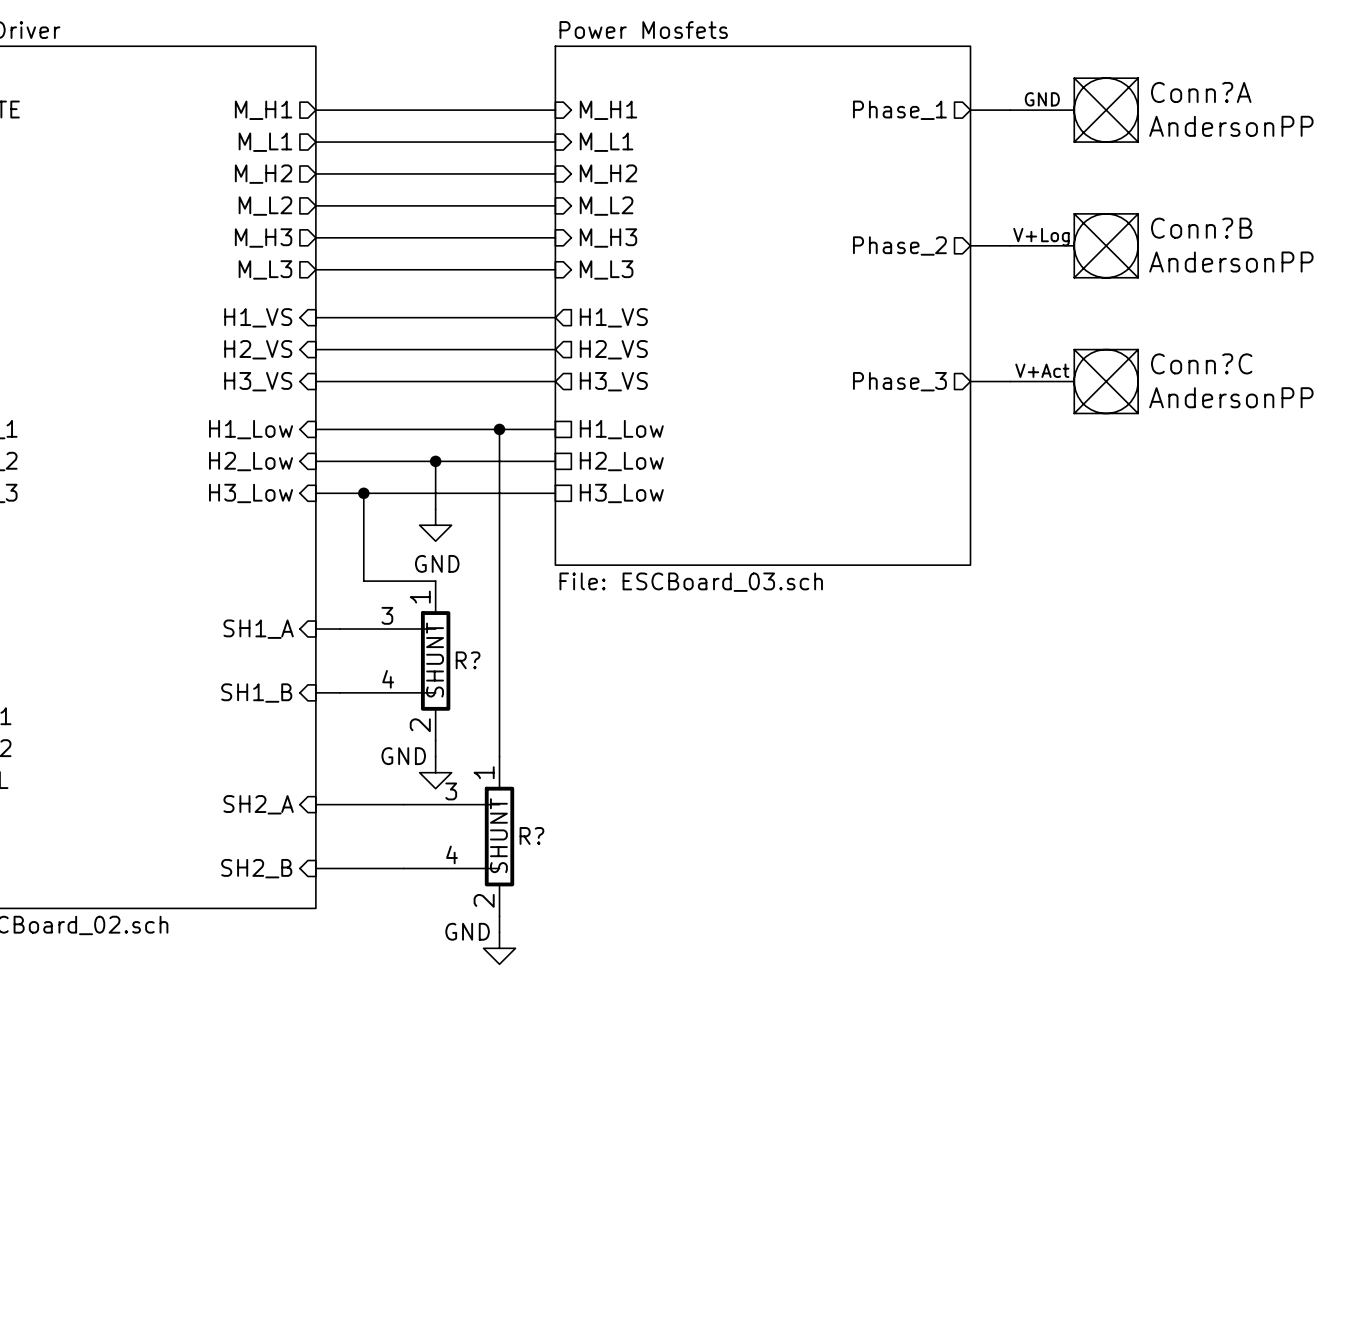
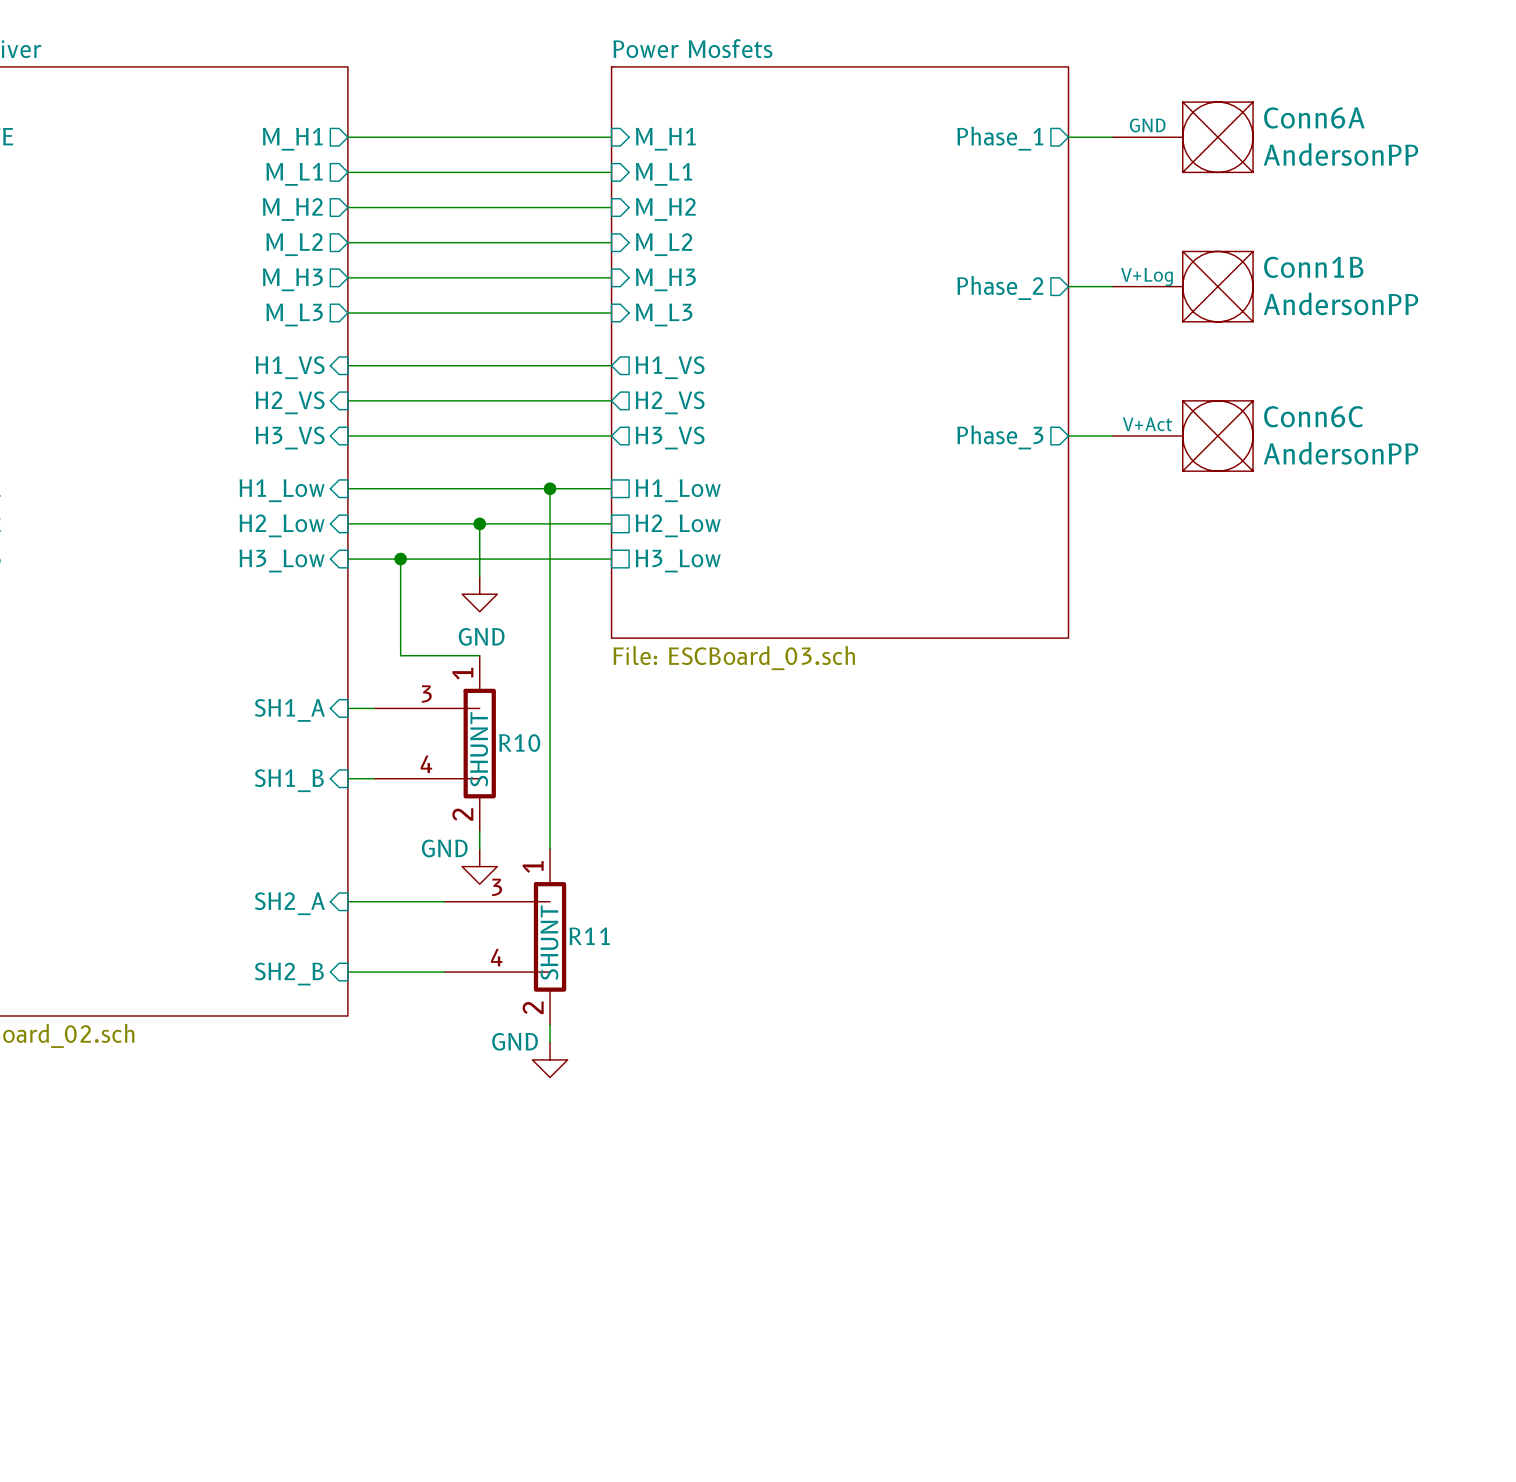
Conn?A name: Conn?A (1201, 92) -> Conn6A (1314, 117)
Conn?B name: Conn?B (1201, 228) -> Conn1B (1313, 267)
Conn?C name: Conn?C (1201, 363) -> Conn6C (1313, 416)
R? name: R? (468, 660) -> R10 (519, 743)
R? name: R? (531, 835) -> R11 (589, 936)

